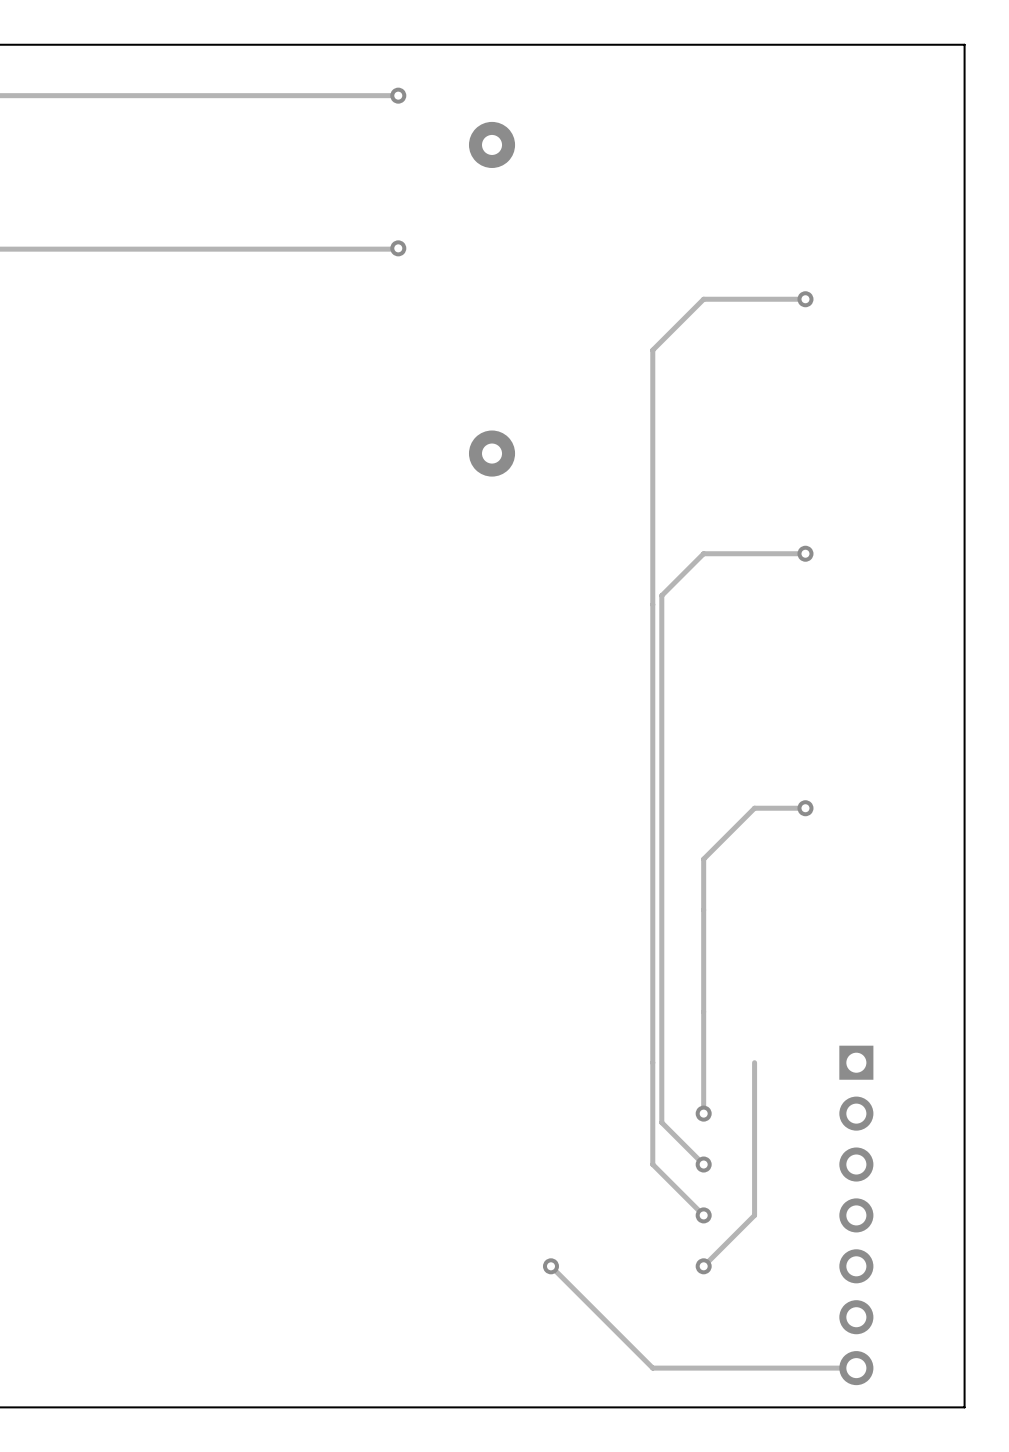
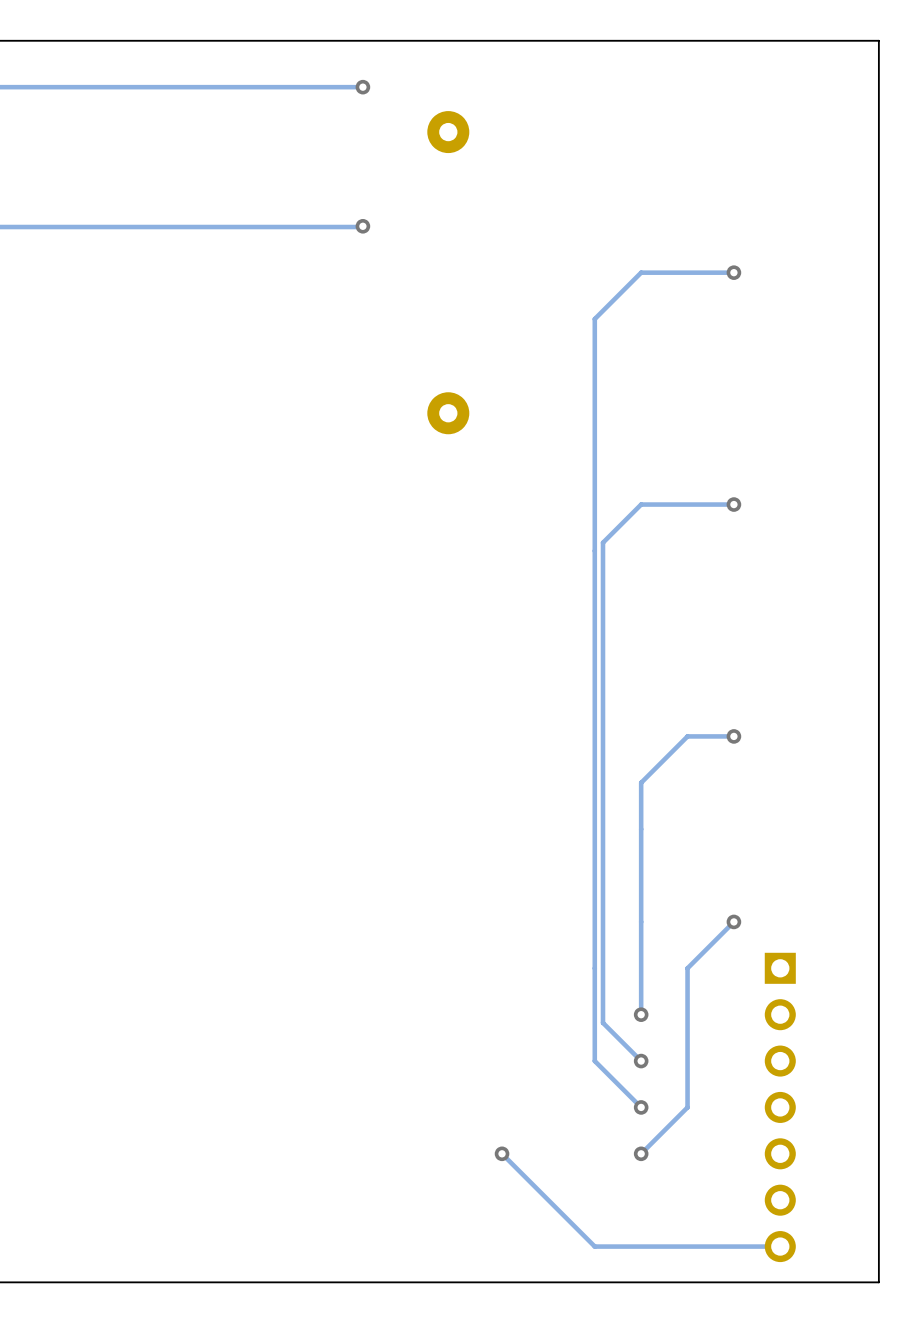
track: none -> (733, 921) (687, 968)
via: none -> (733, 921)

